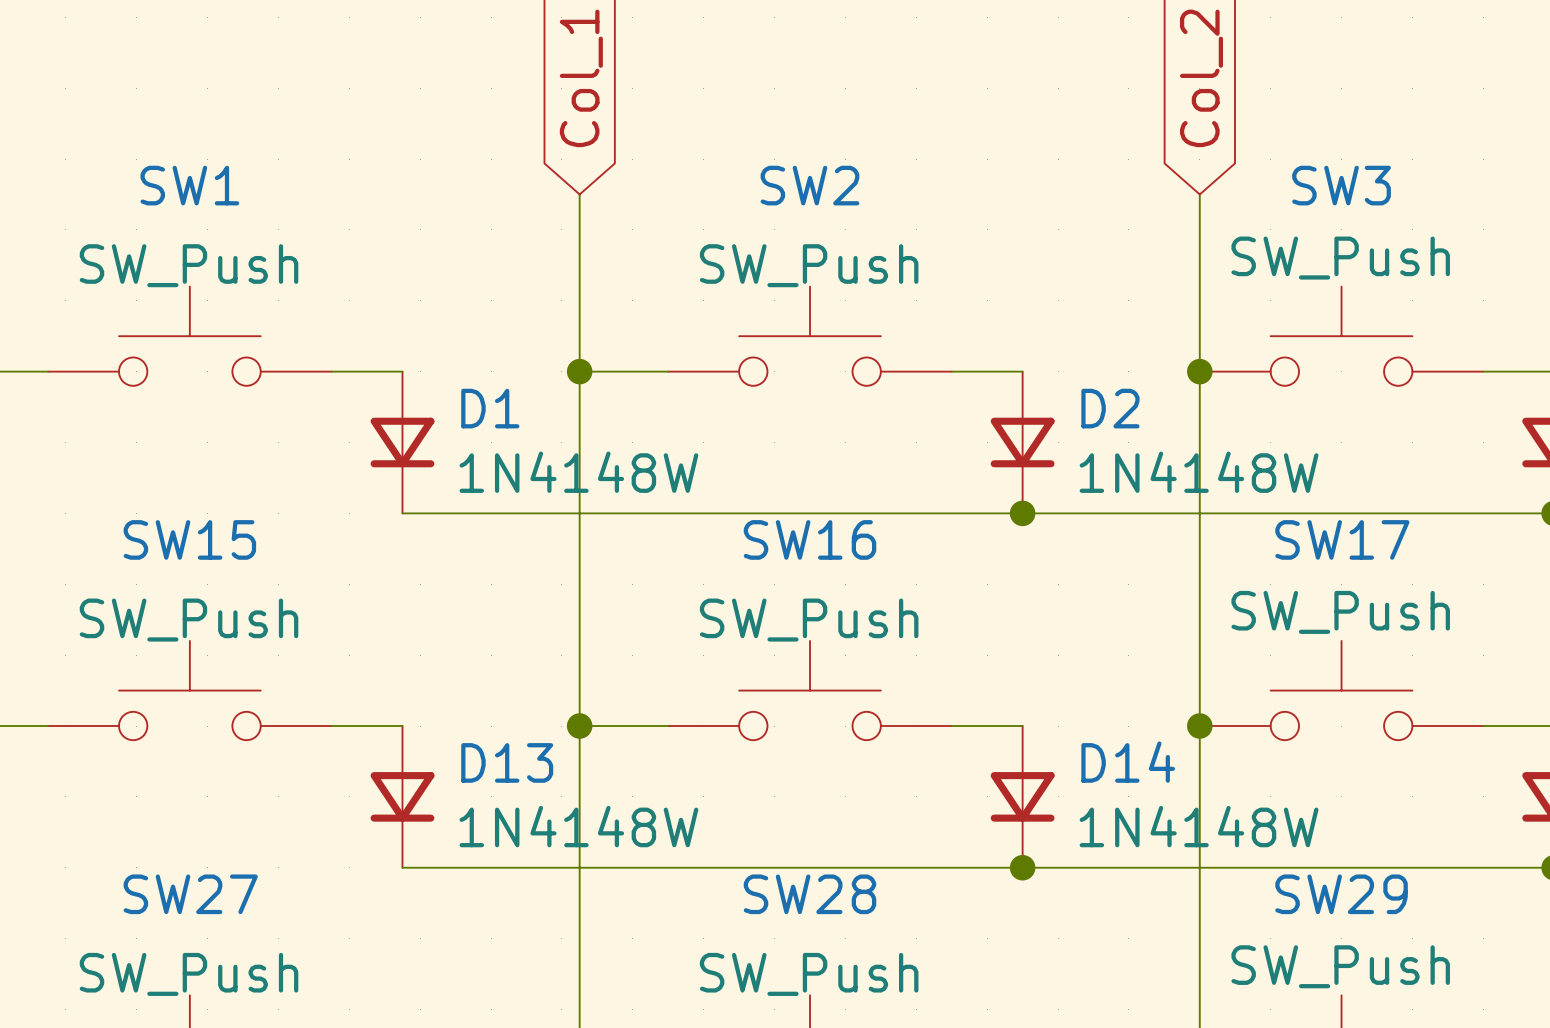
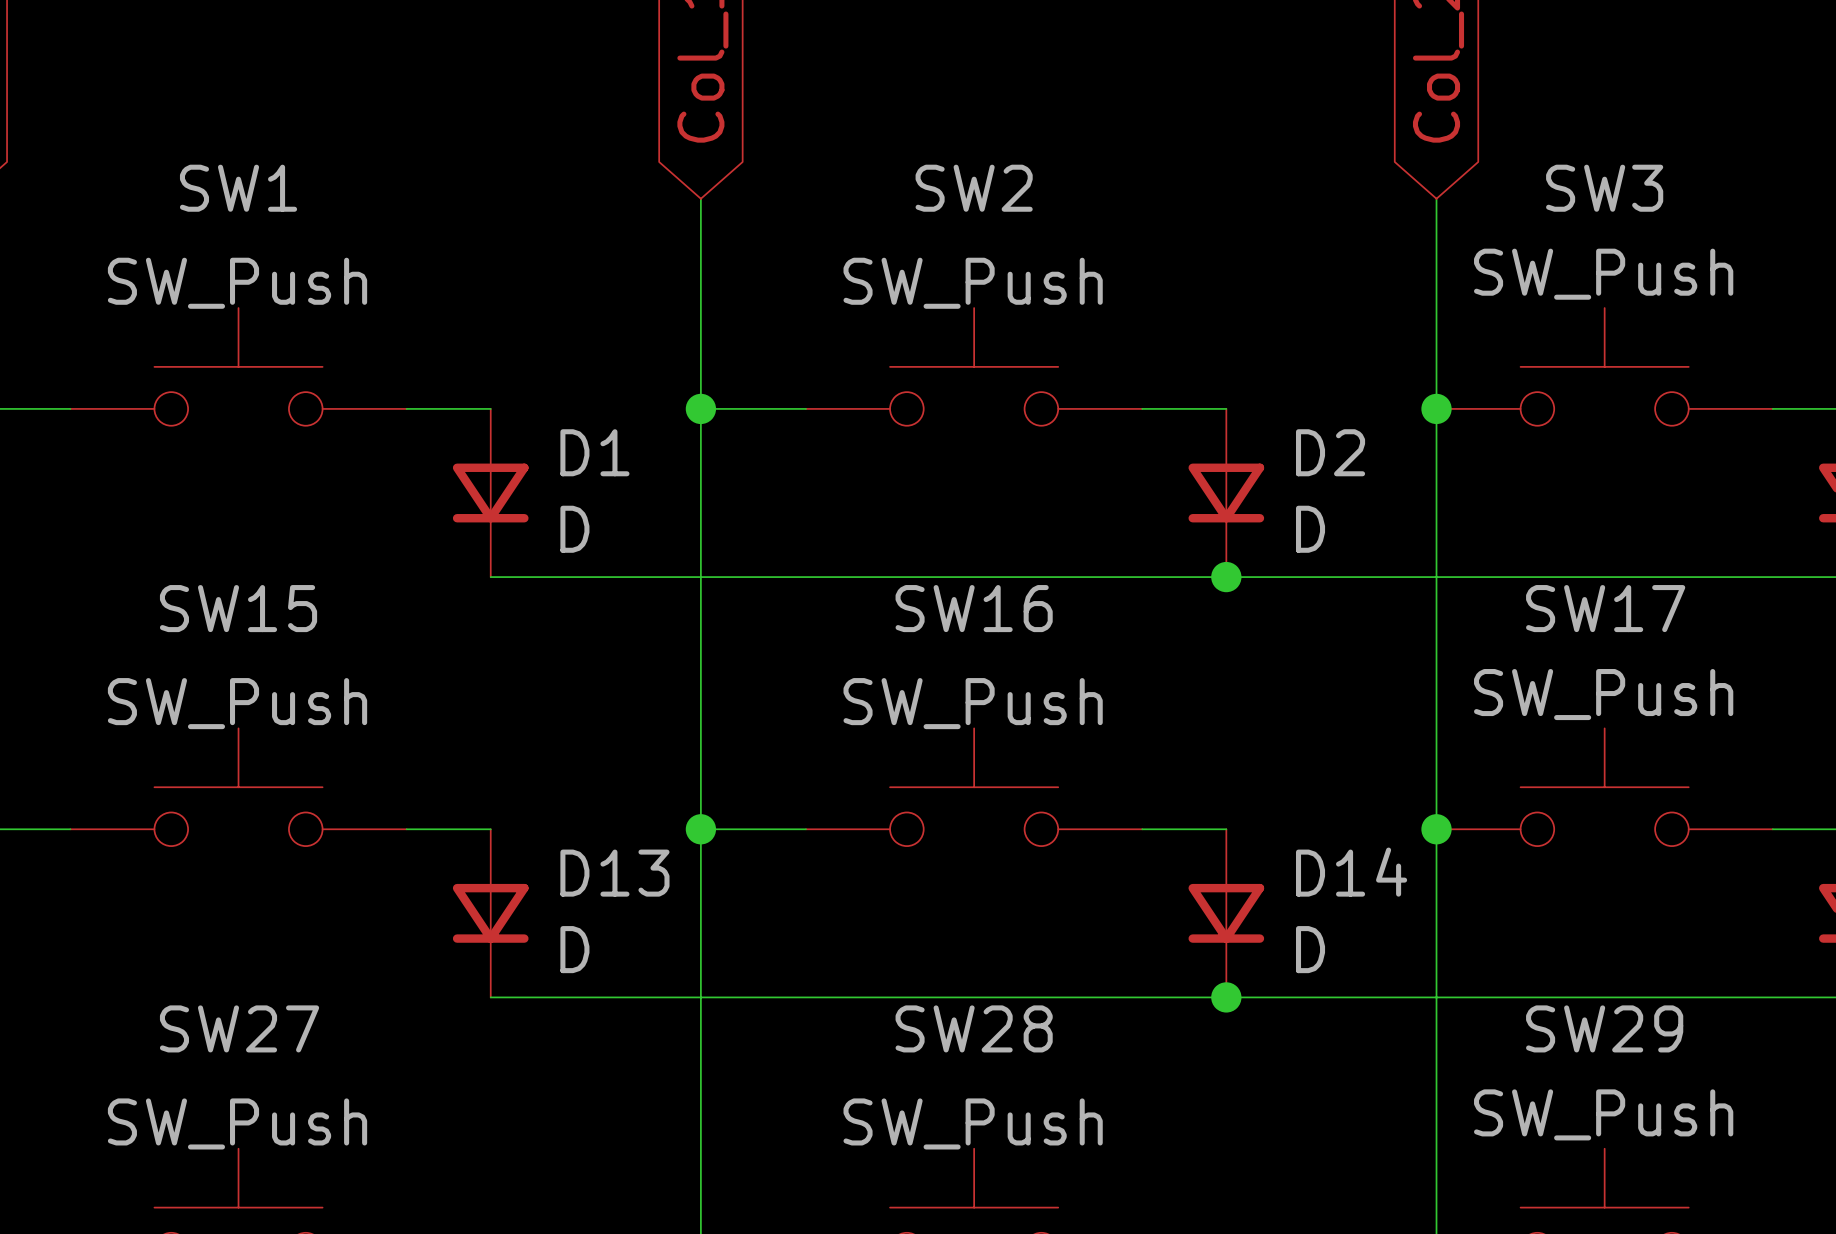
D1 value: 1N4148W (578, 472) -> D (574, 529)
D2 value: 1N4148W (1199, 472) -> D (1310, 529)
D13 value: 1N4148W (578, 826) -> D (574, 949)
D14 value: 1N4148W (1199, 826) -> D (1310, 949)

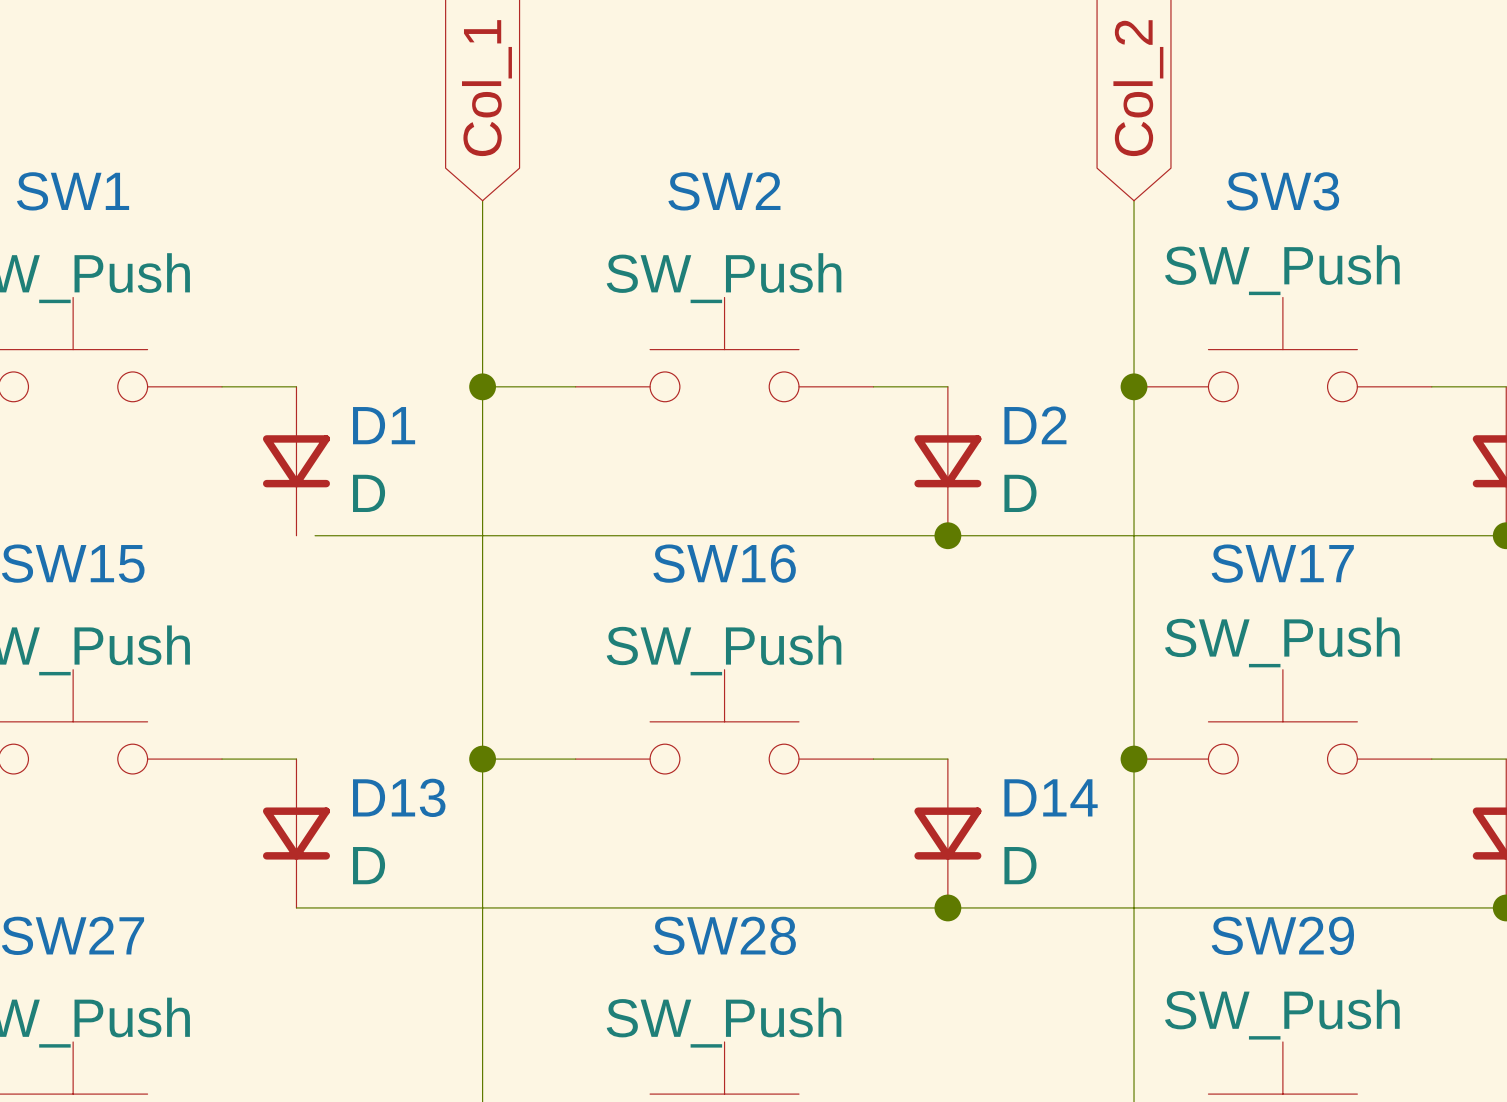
wire: (490, 577) (511, 577) -> none

